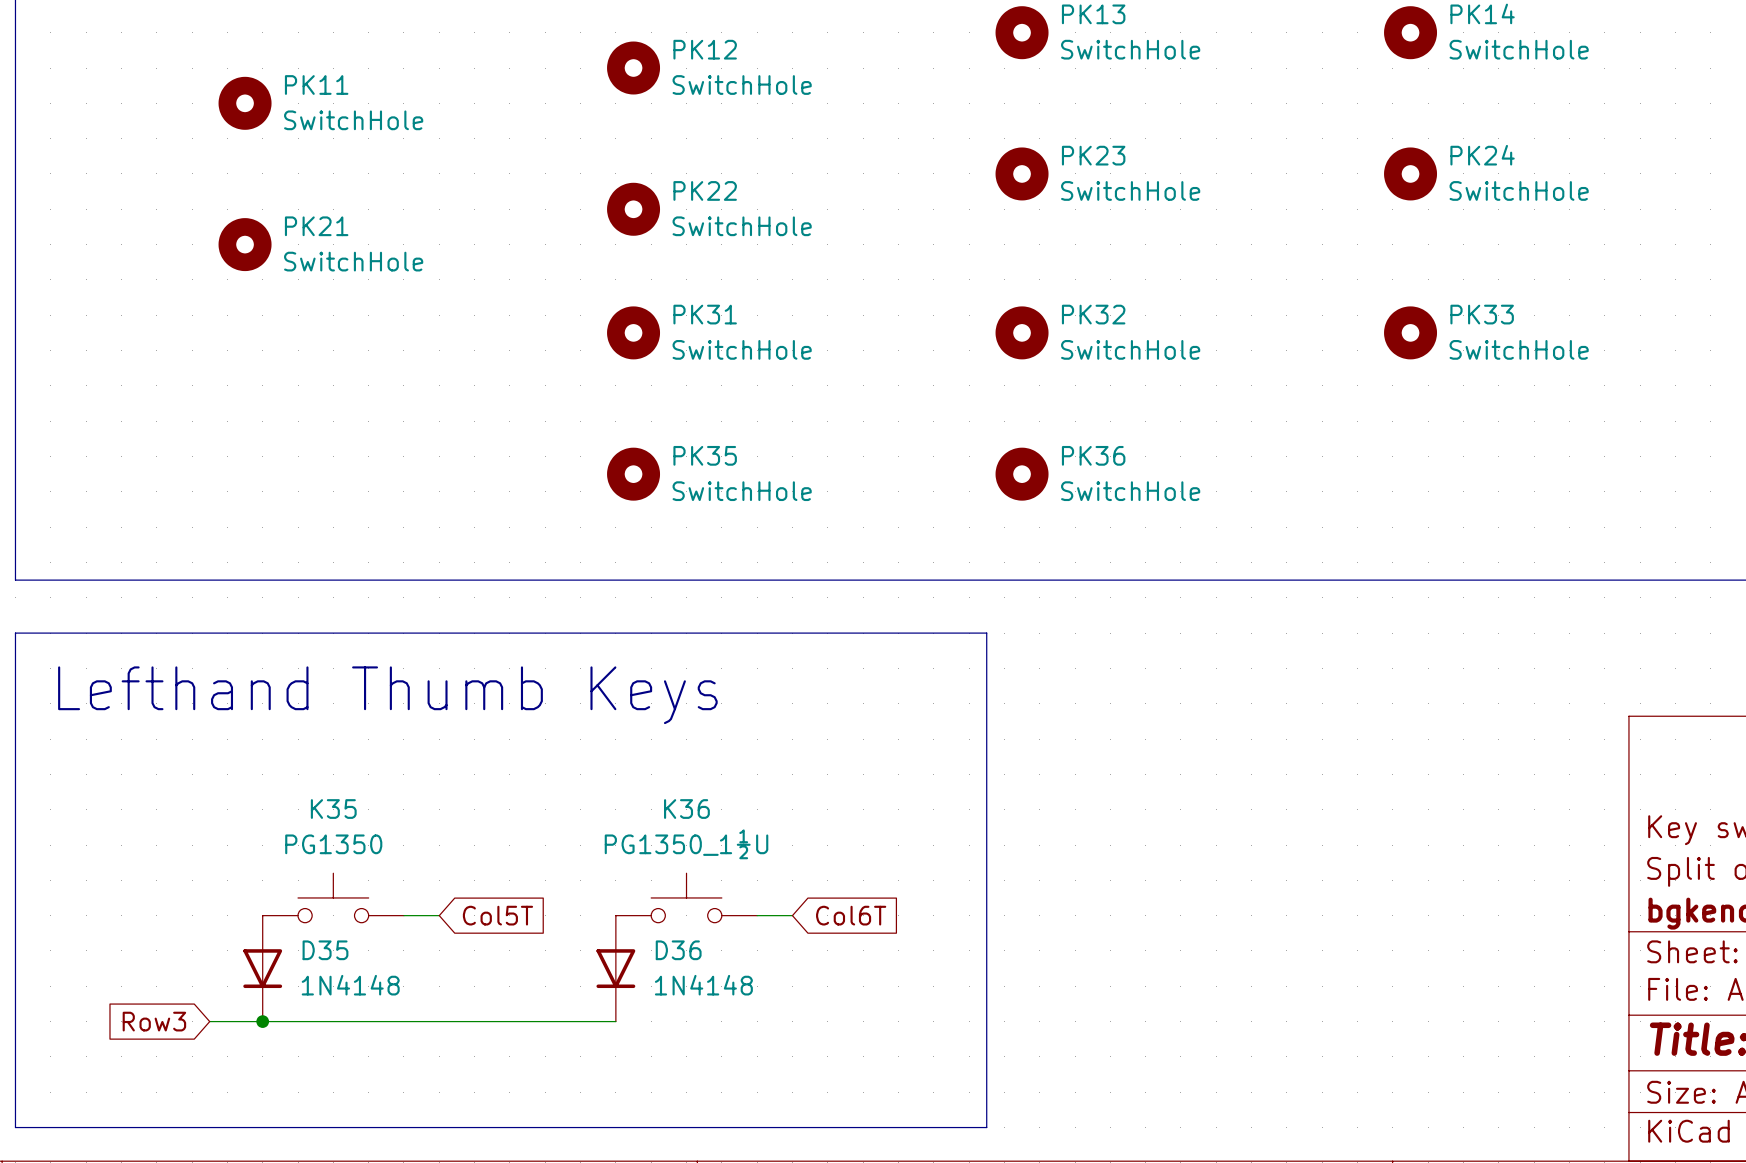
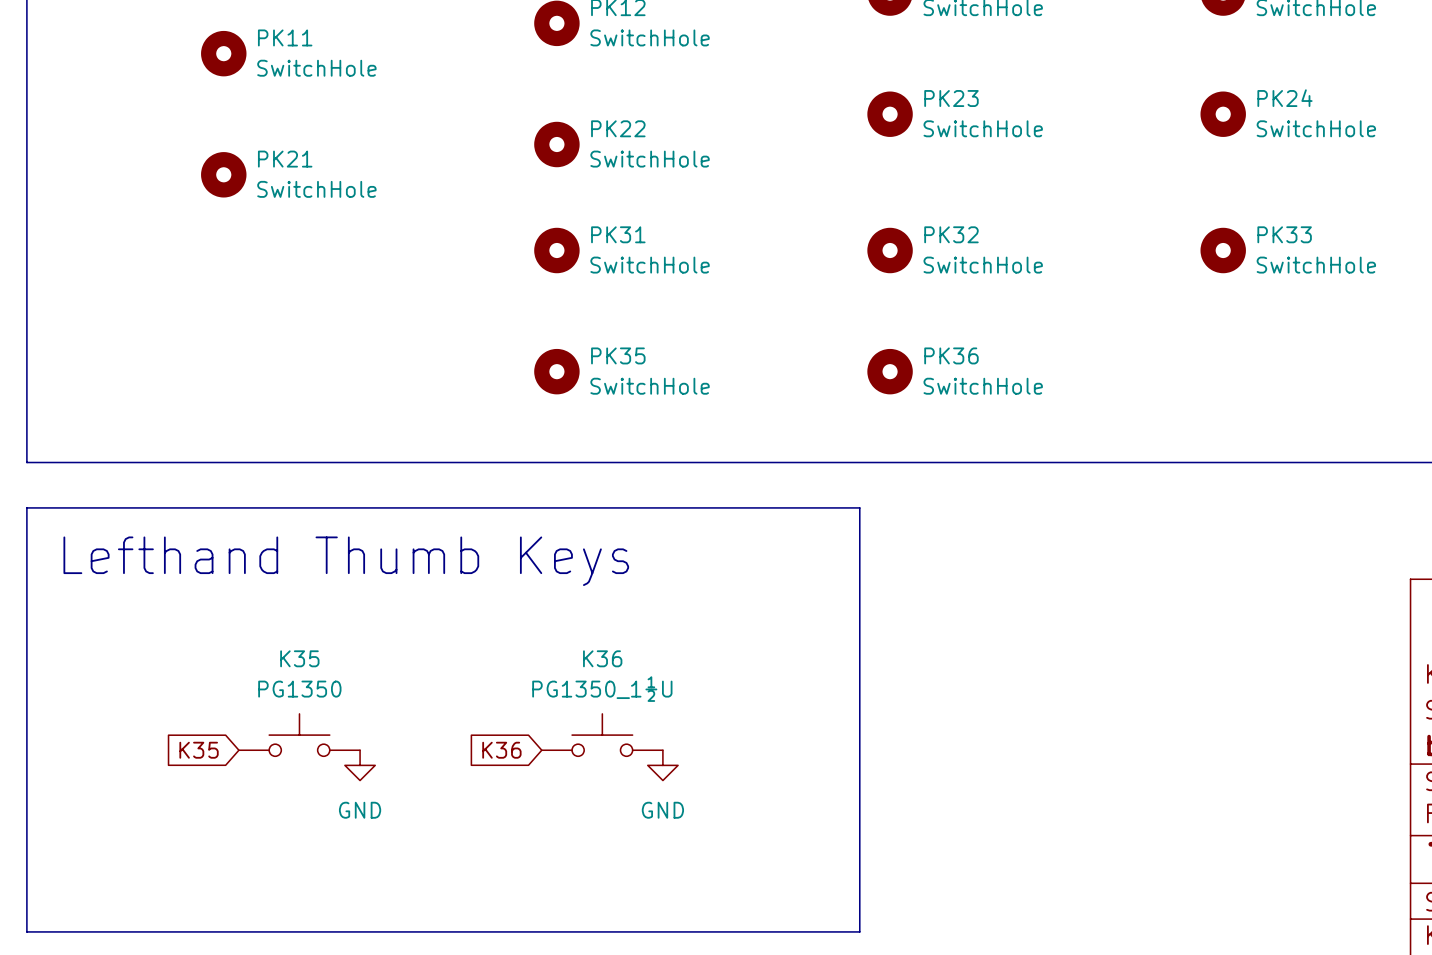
global label: none -> K35 (199, 750)
wire: (403, 915) (439, 915) -> none
global label: Col5T (497, 915) -> none
global label: none -> K36 (501, 750)
wire: (757, 915) (792, 915) -> none
global label: Col6T (851, 915) -> none
power symbol: none -> GND (360, 765)
power symbol: none -> GND (662, 765)
D35: 1N4148 (262, 968) -> none
D36: 1N4148 (615, 968) -> none
global label: Row3 (154, 1021) -> none
wire: (209, 1021) (615, 1021) -> none
junction: (262, 1021) -> none

